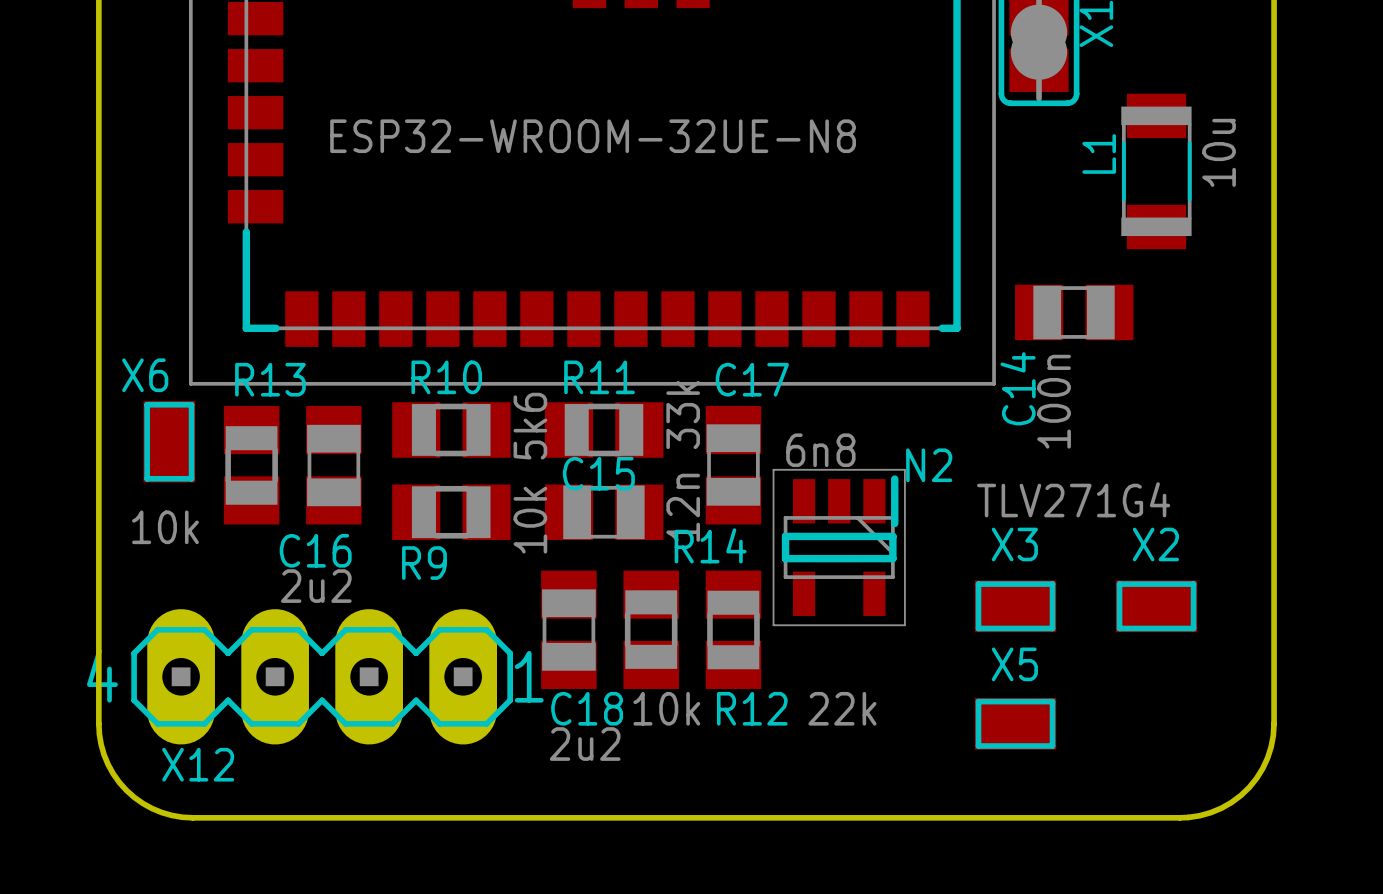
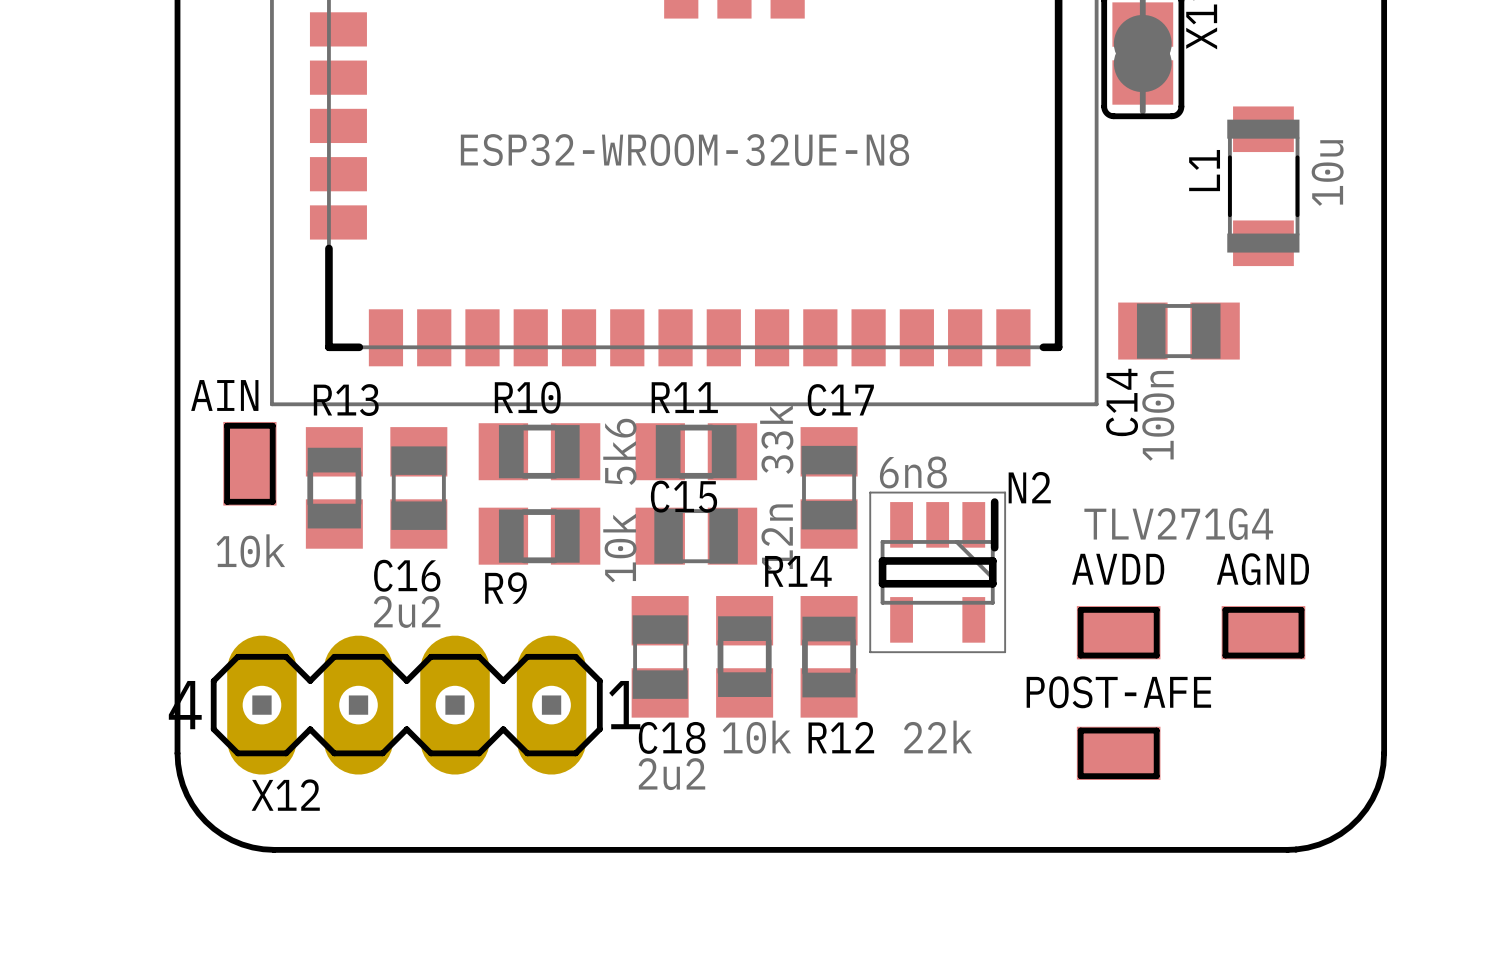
X6 name: X6 (145, 375) -> AIN (224, 395)
X3 name: X3 (1014, 544) -> AVDD (1118, 569)
X2 name: X2 (1155, 544) -> AGND (1262, 569)
X5 name: X5 (1014, 664) -> POST-AFE (1118, 692)

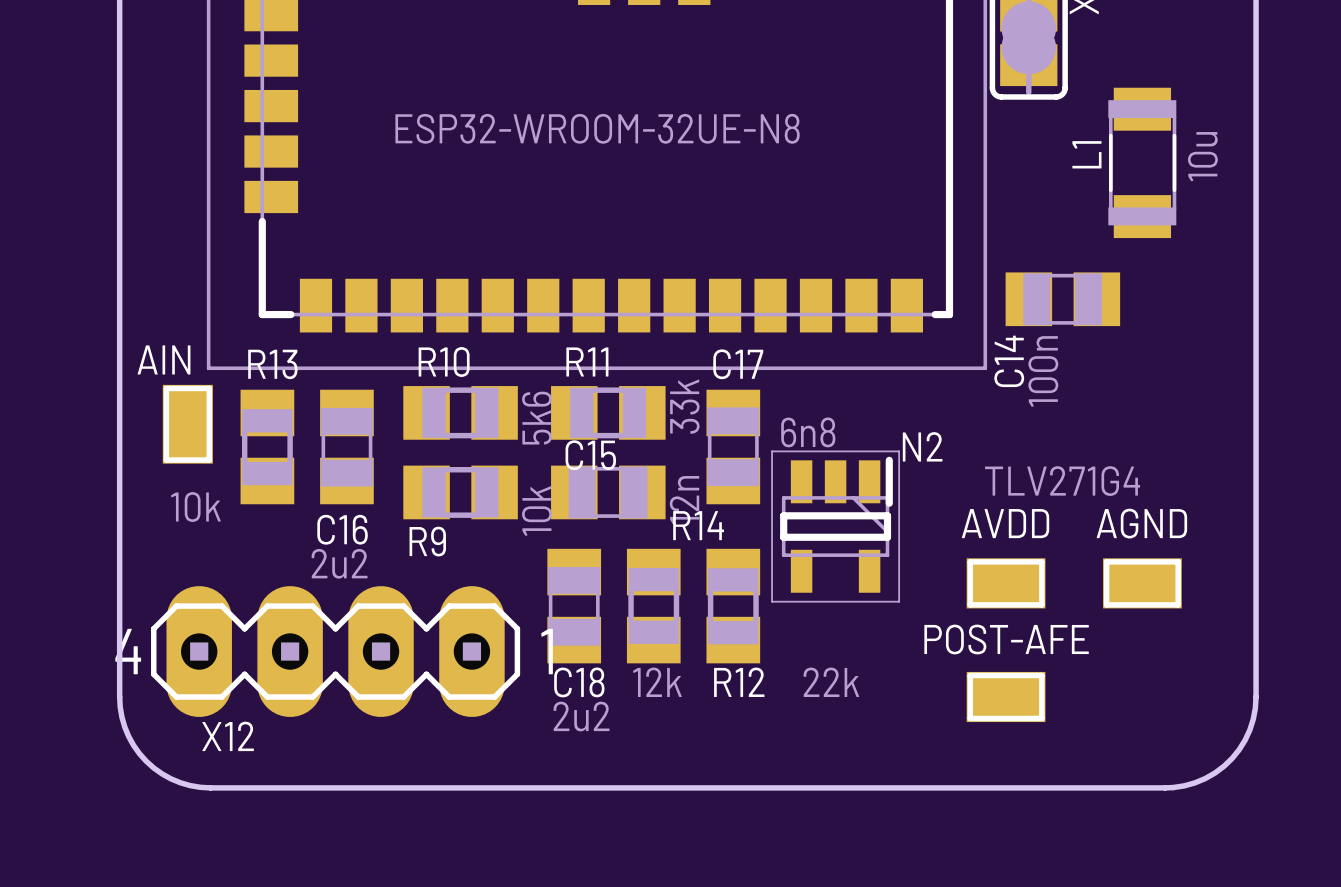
R14 value: 10k (756, 737) -> 12k (657, 682)

